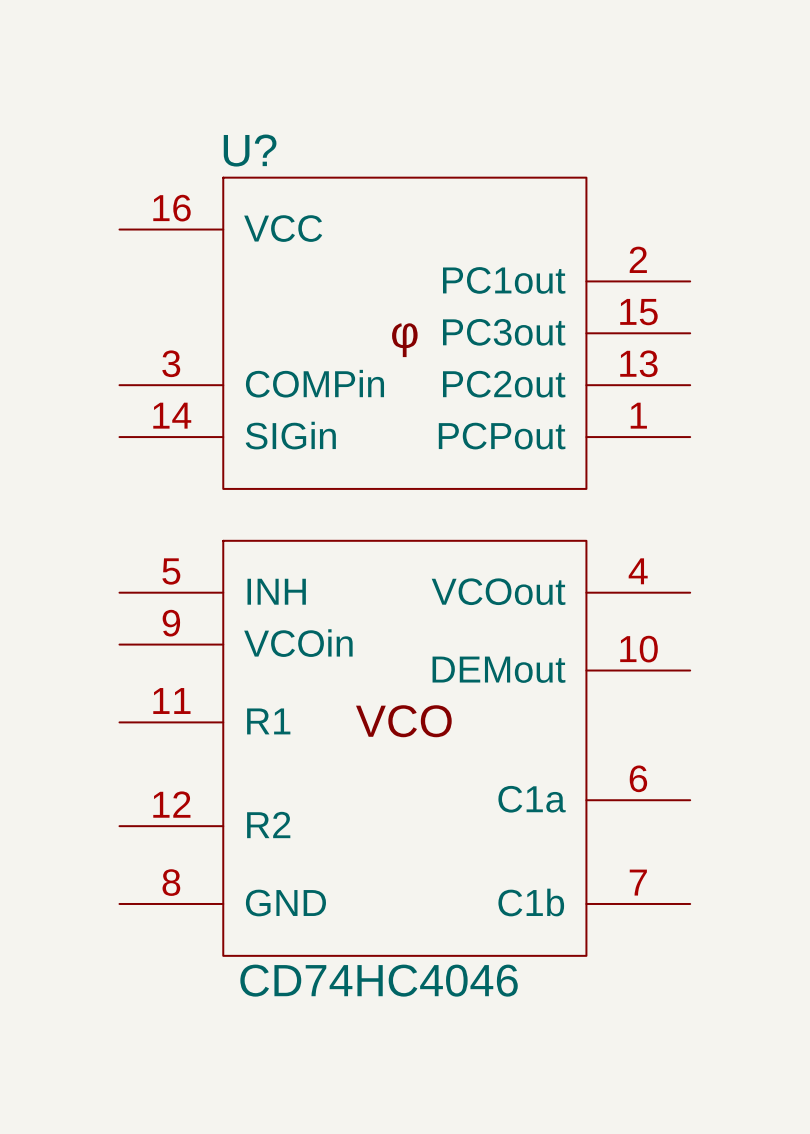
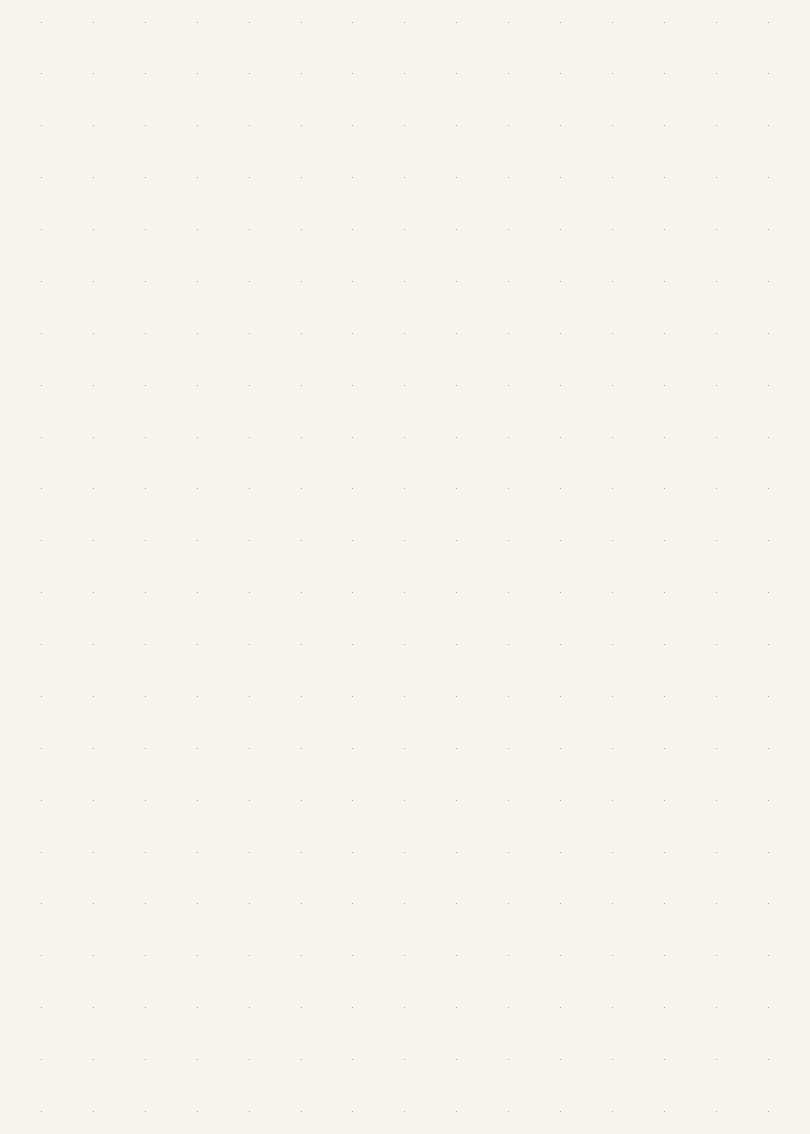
U?: CD74HC4046 (404, 566) -> none

